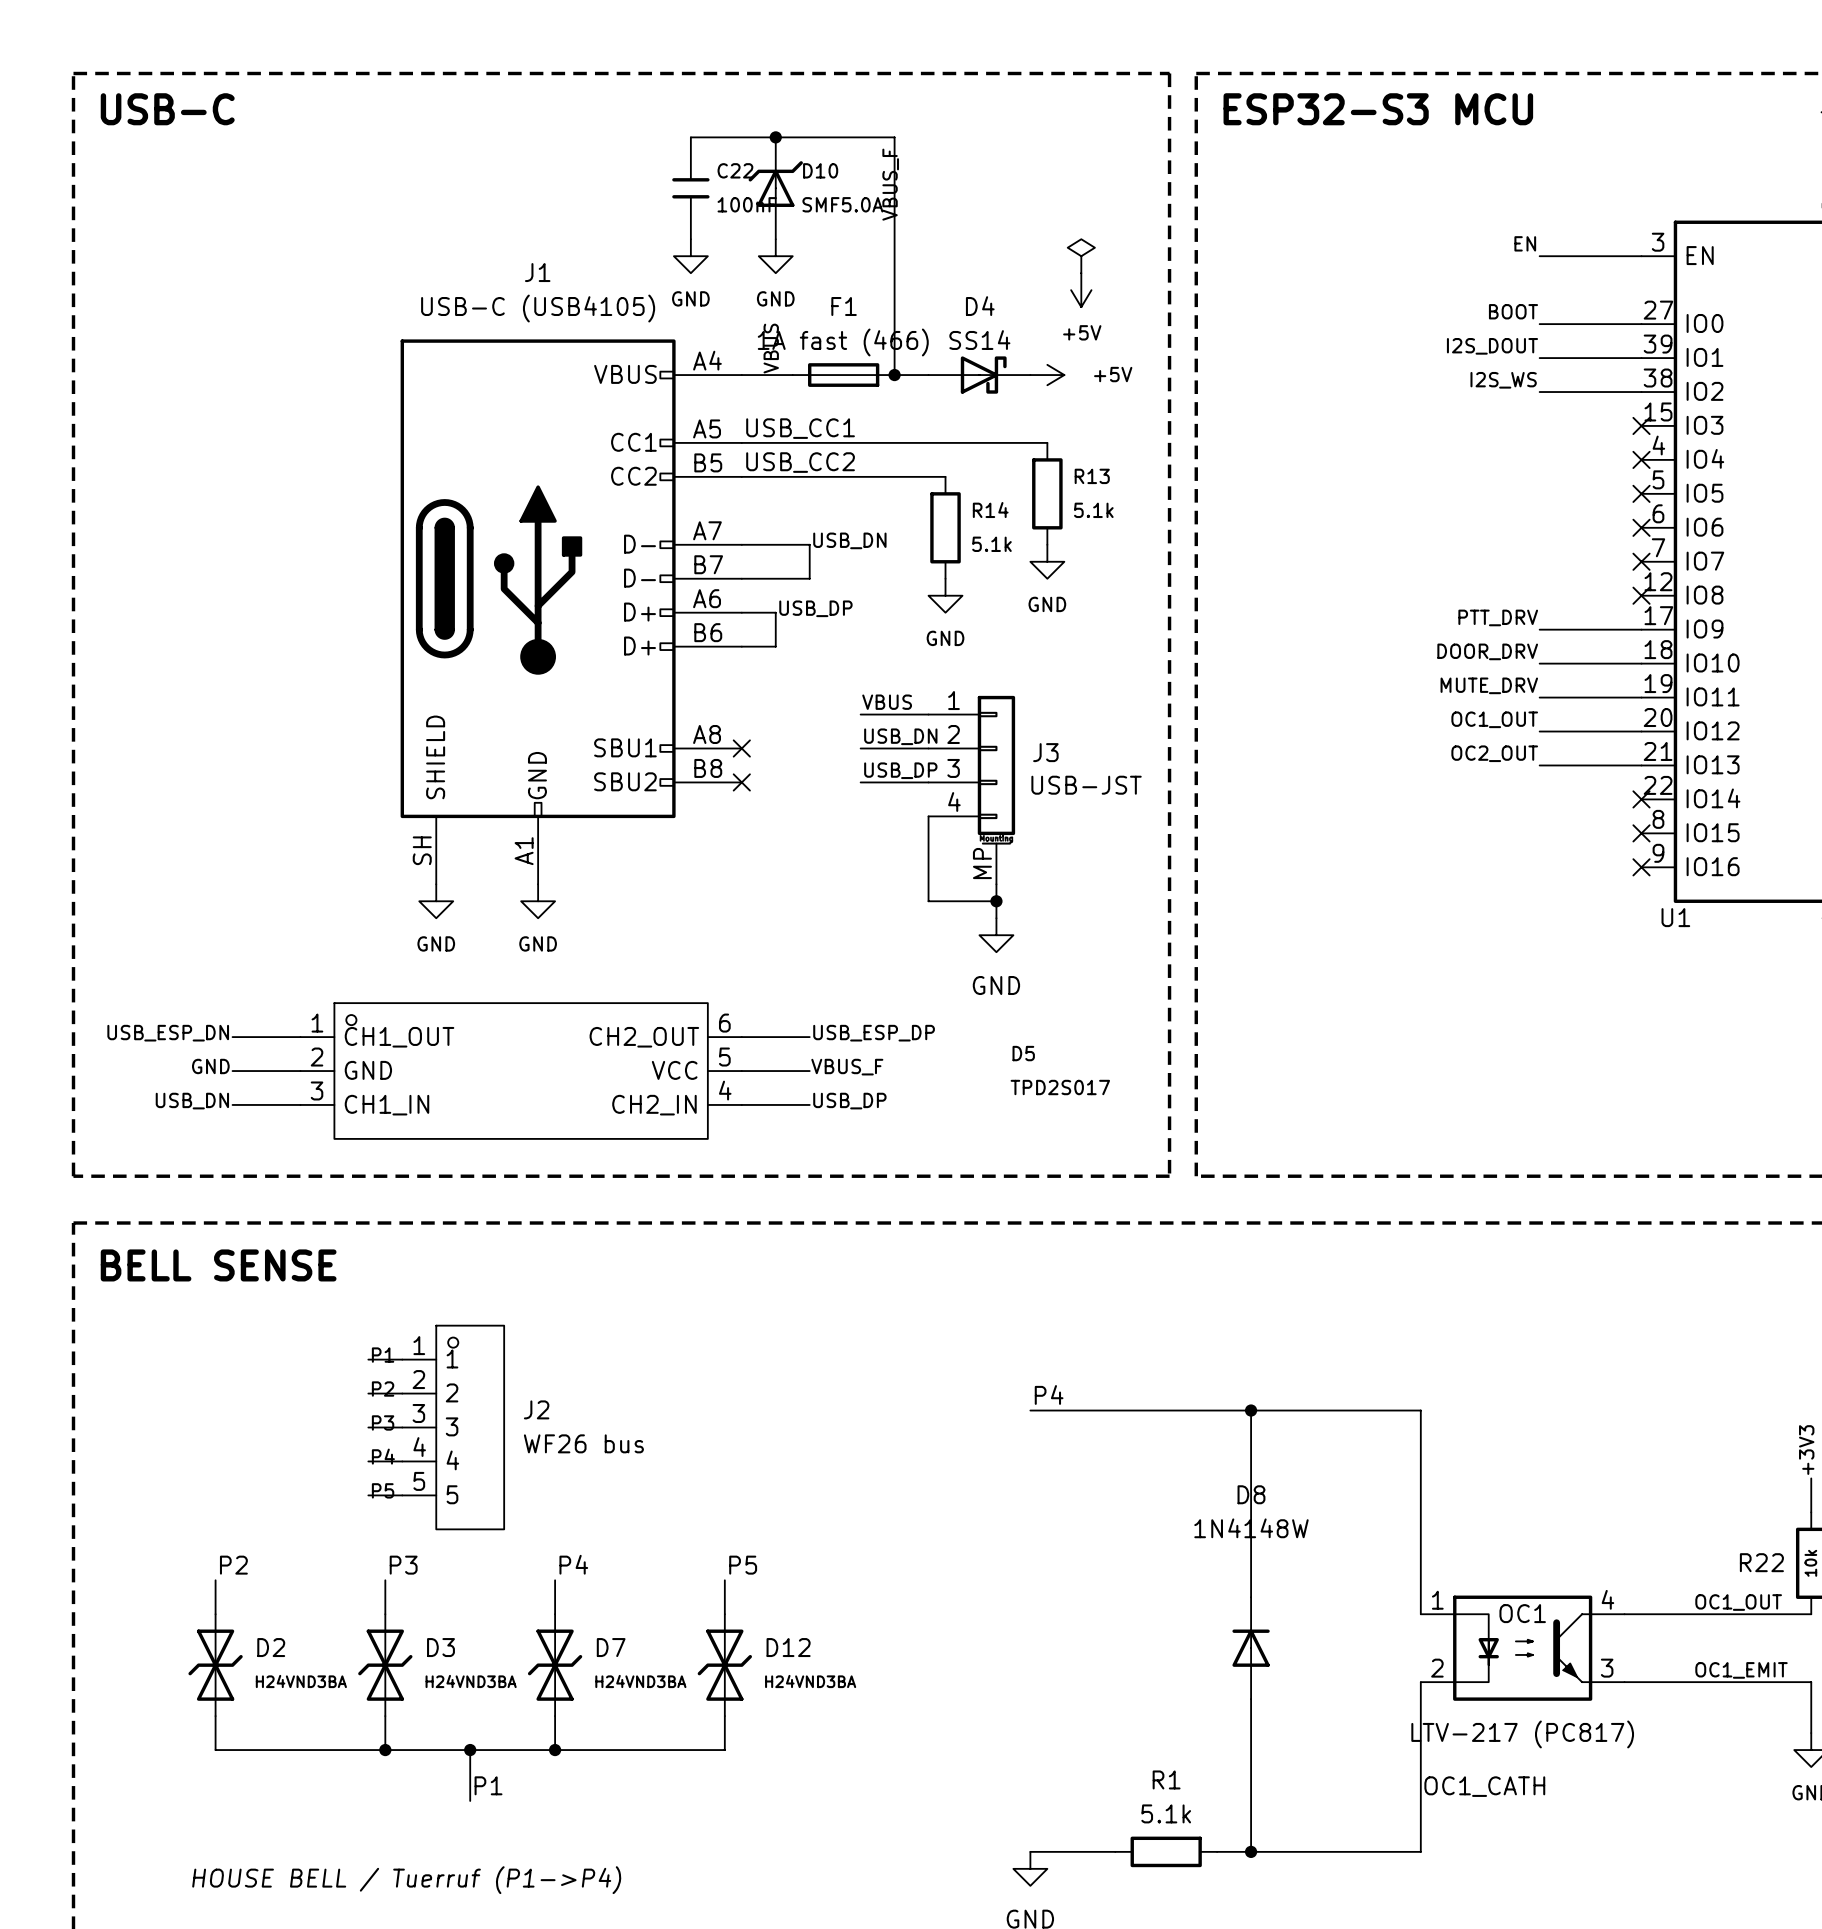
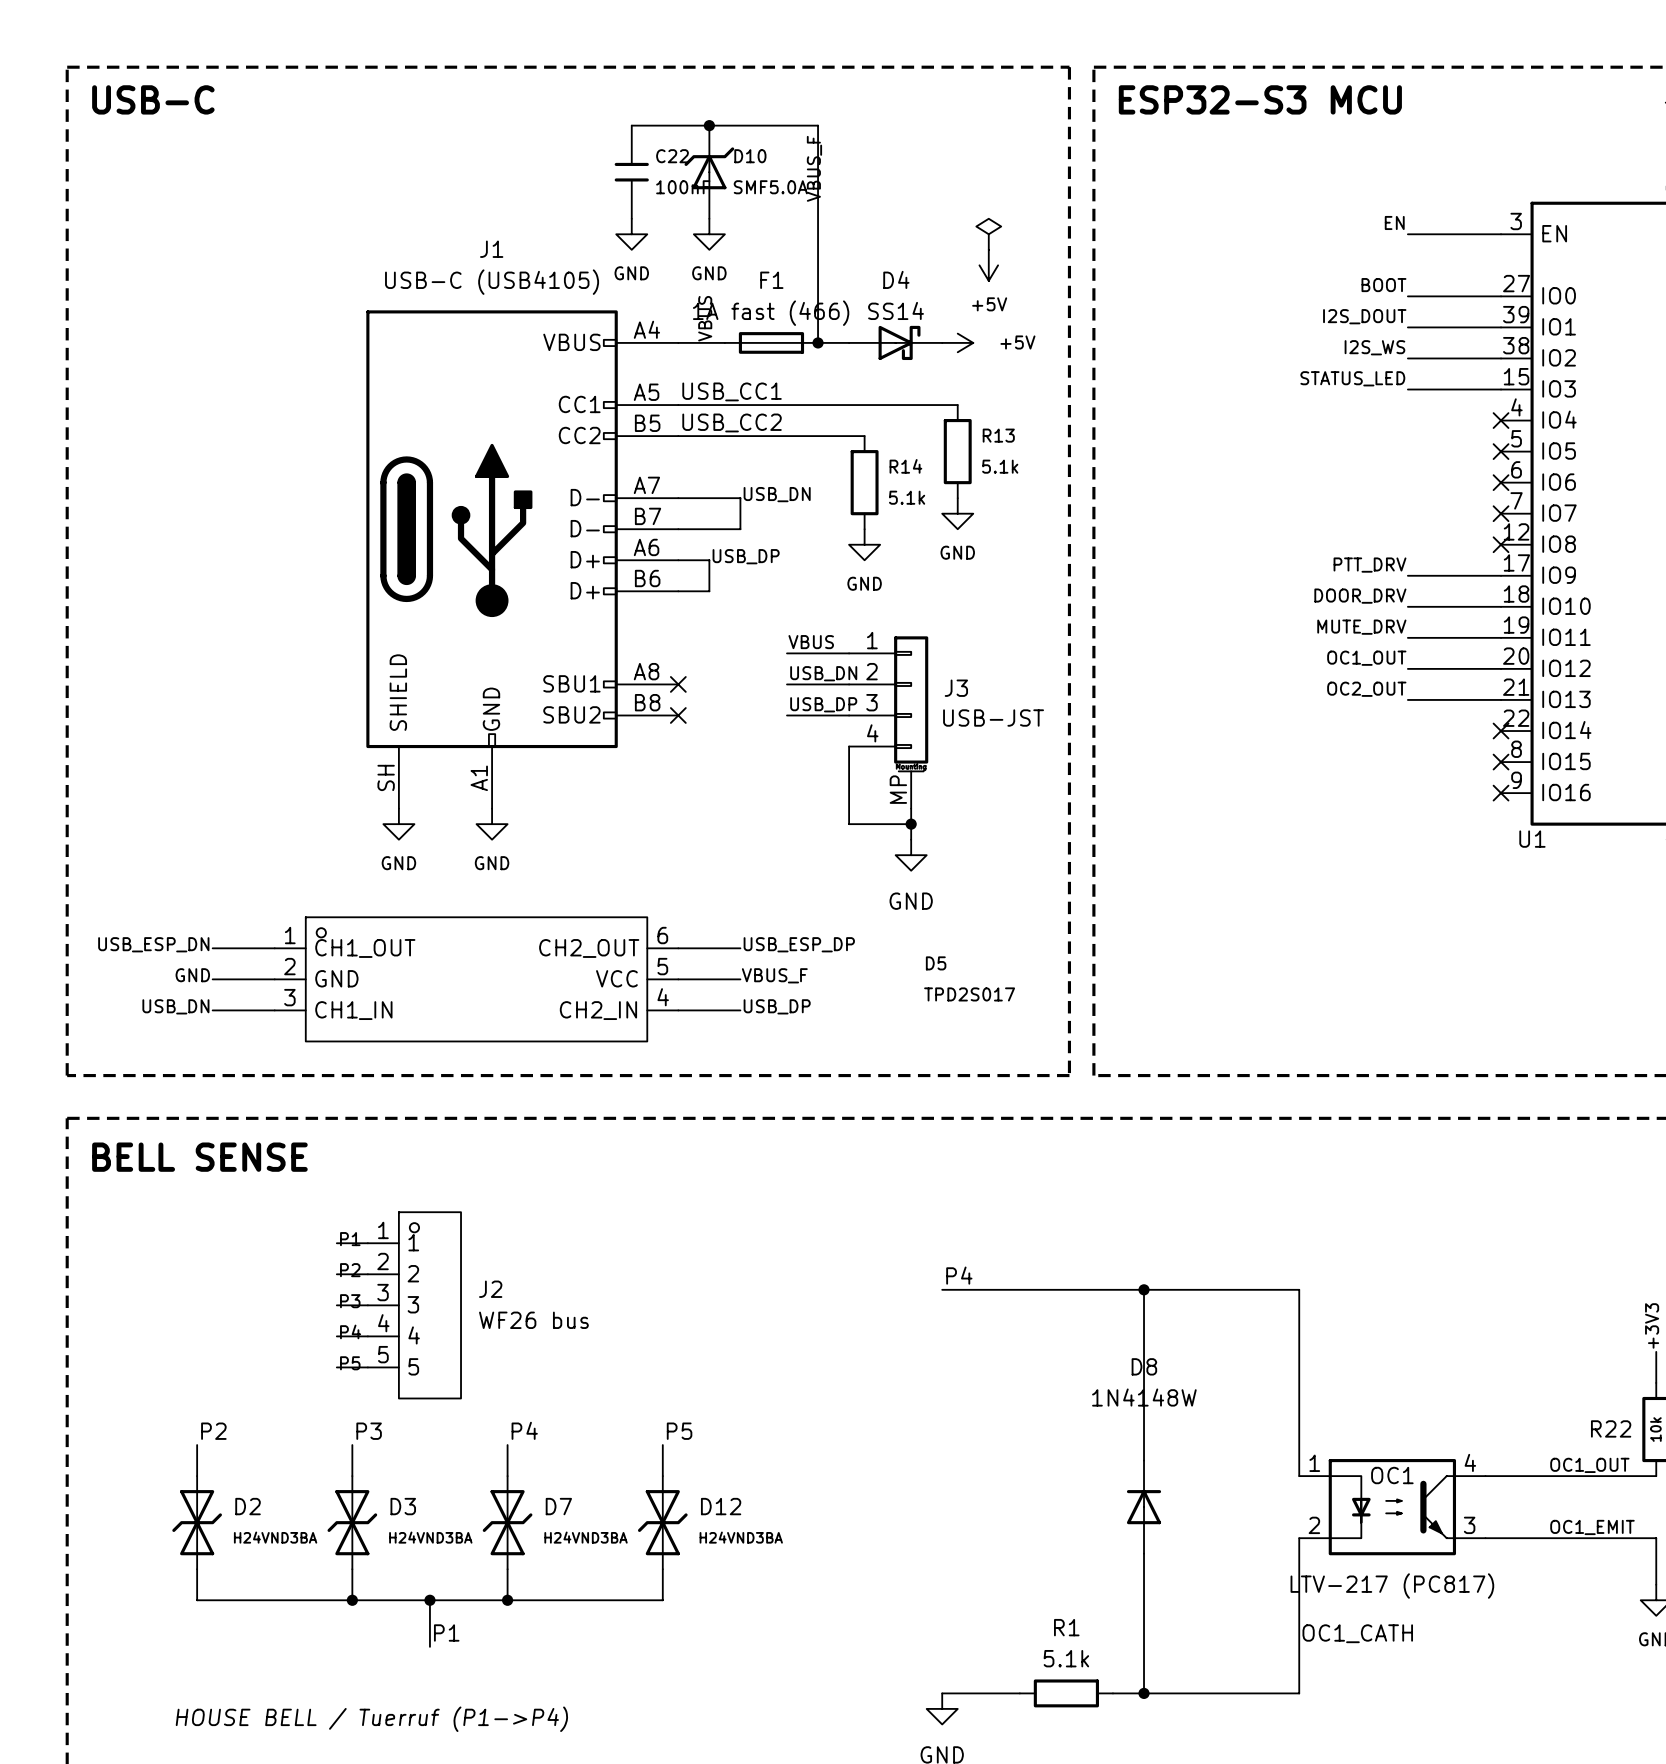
label: none -> STATUS_LED (1352, 378)
wire: none -> (1407, 389) (1501, 389)
no-connect mark: (1641, 425) -> none

